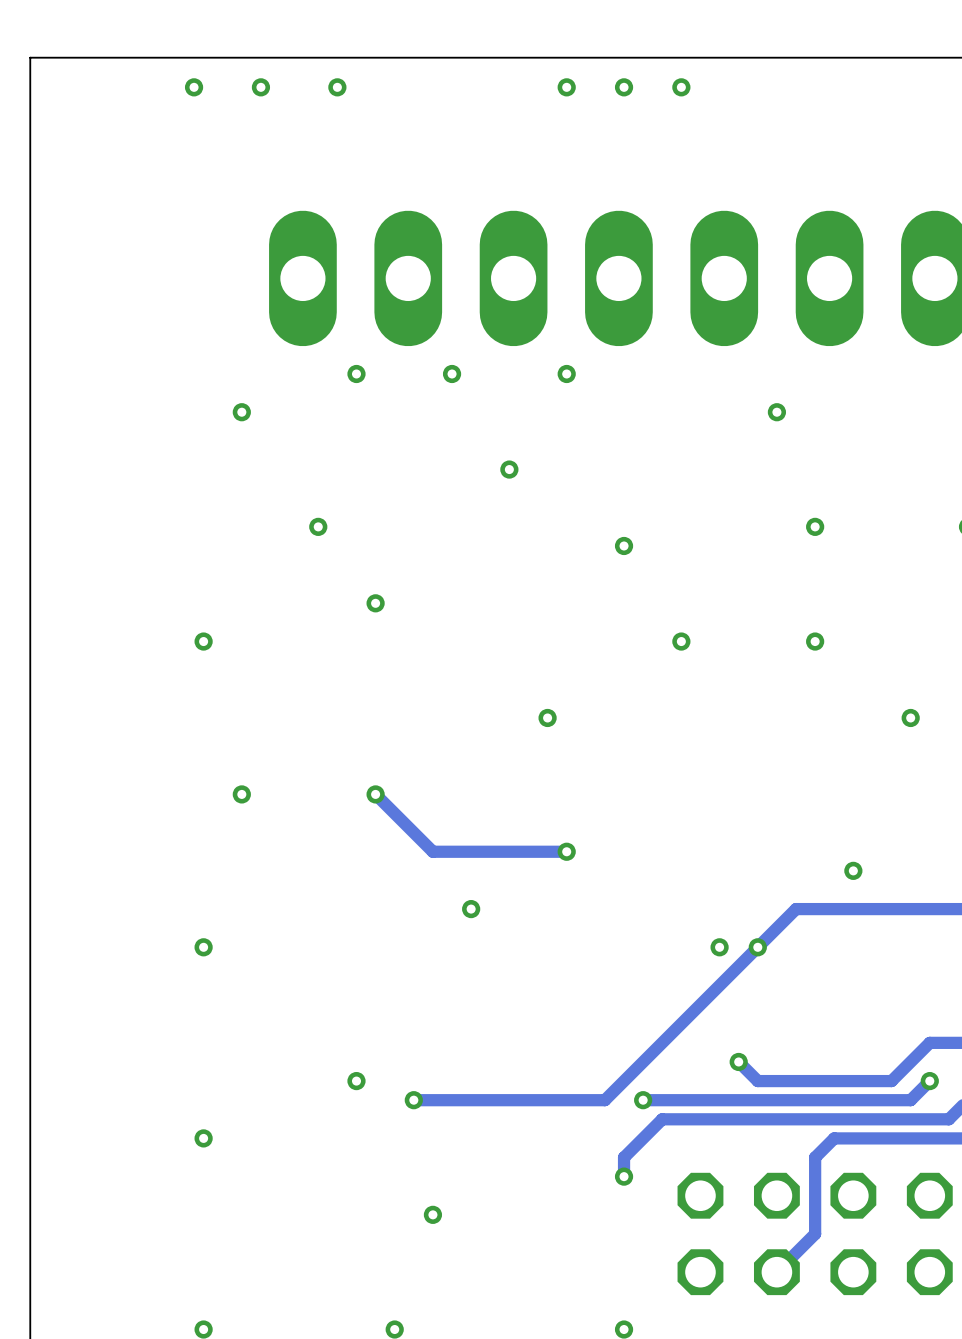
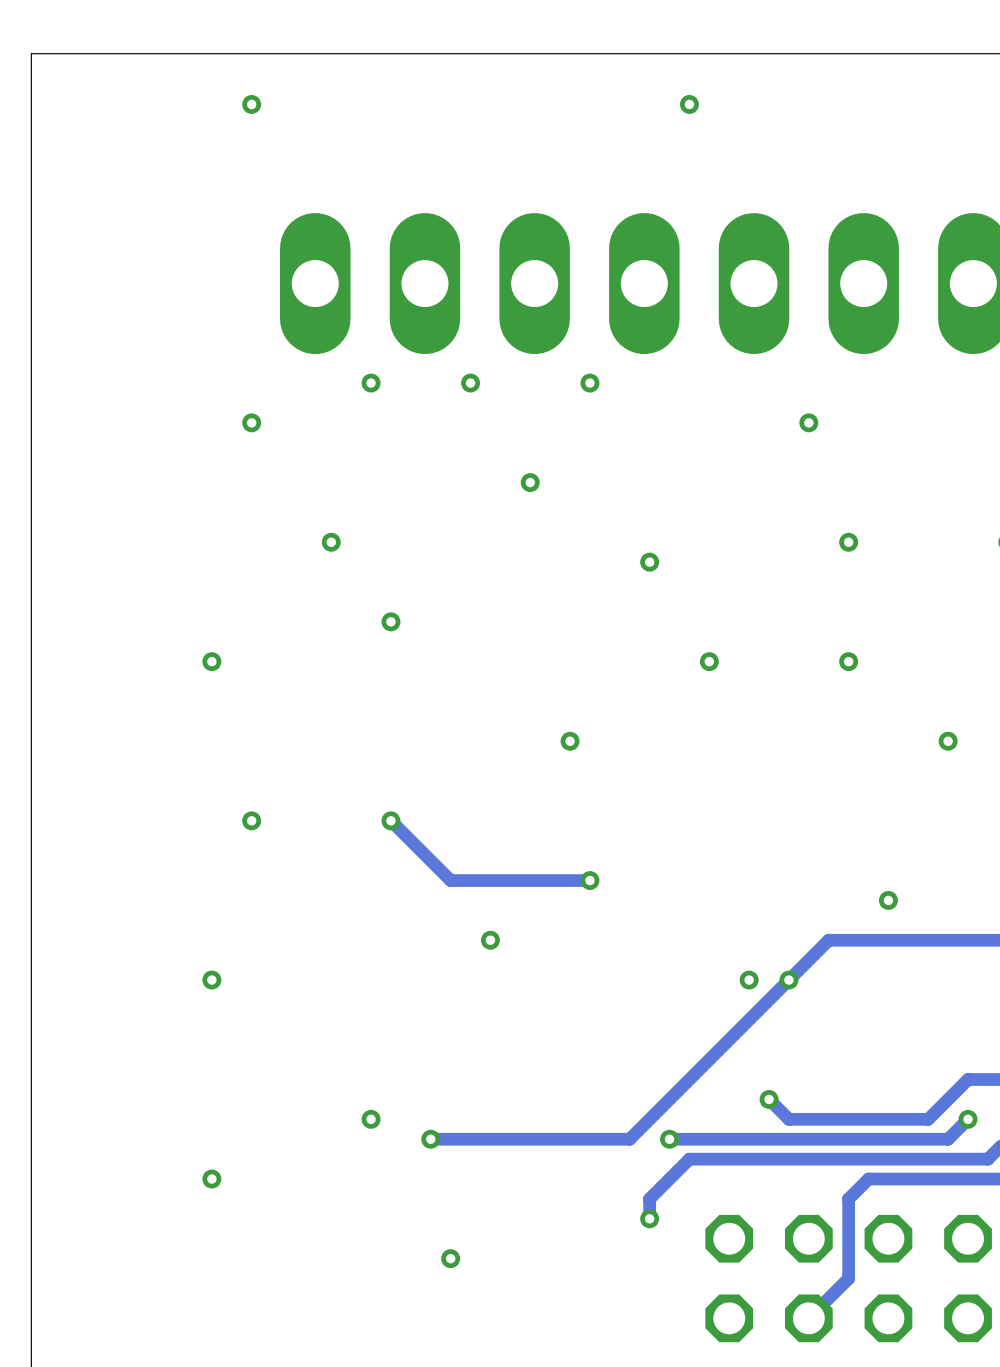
via: (194, 87) -> none
via: (260, 87) -> none
via: (337, 87) -> none
via: (566, 87) -> none
via: (624, 87) -> none
via: (681, 87) -> none
via: none -> (251, 104)
via: none -> (689, 104)

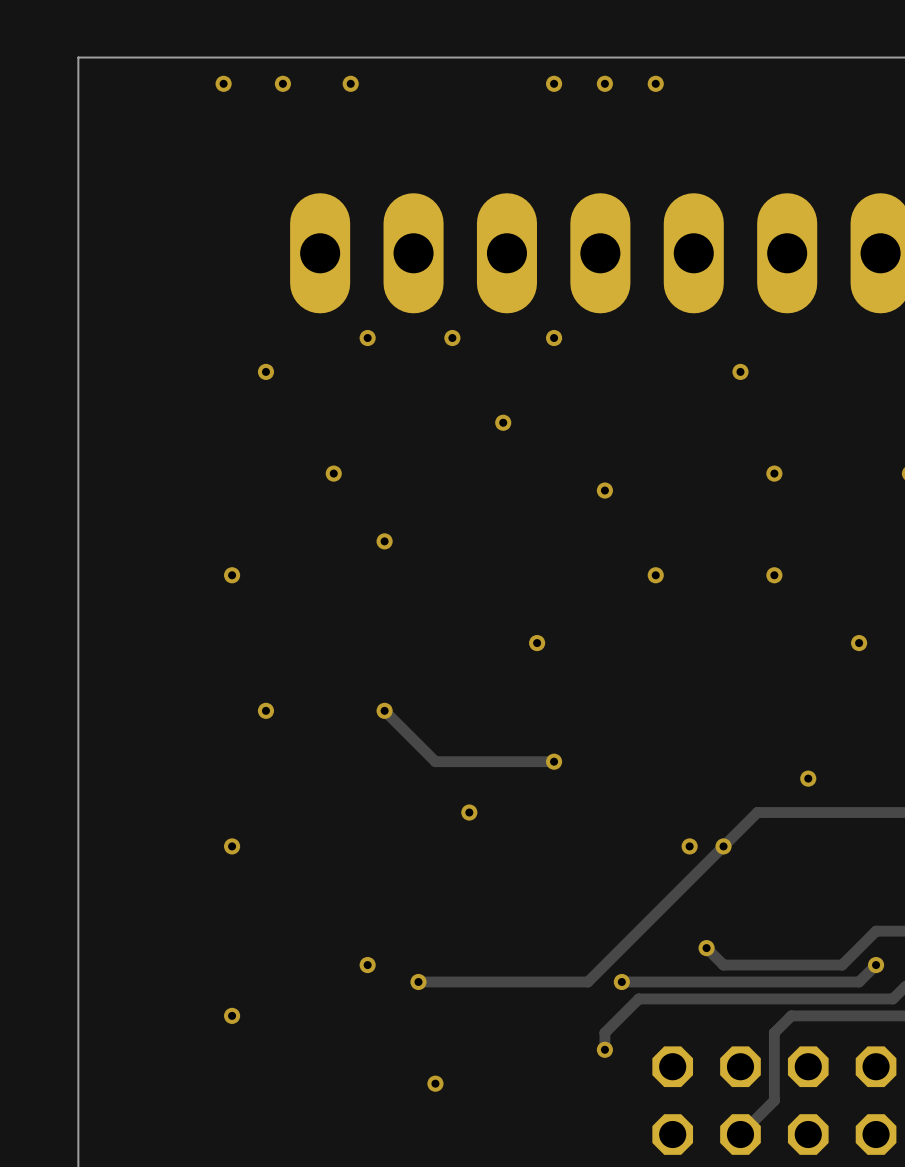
via: none -> (223, 83)
via: none -> (282, 83)
via: none -> (350, 83)
via: none -> (554, 83)
via: none -> (604, 83)
via: none -> (655, 83)
via: (251, 104) -> none
via: (689, 104) -> none

